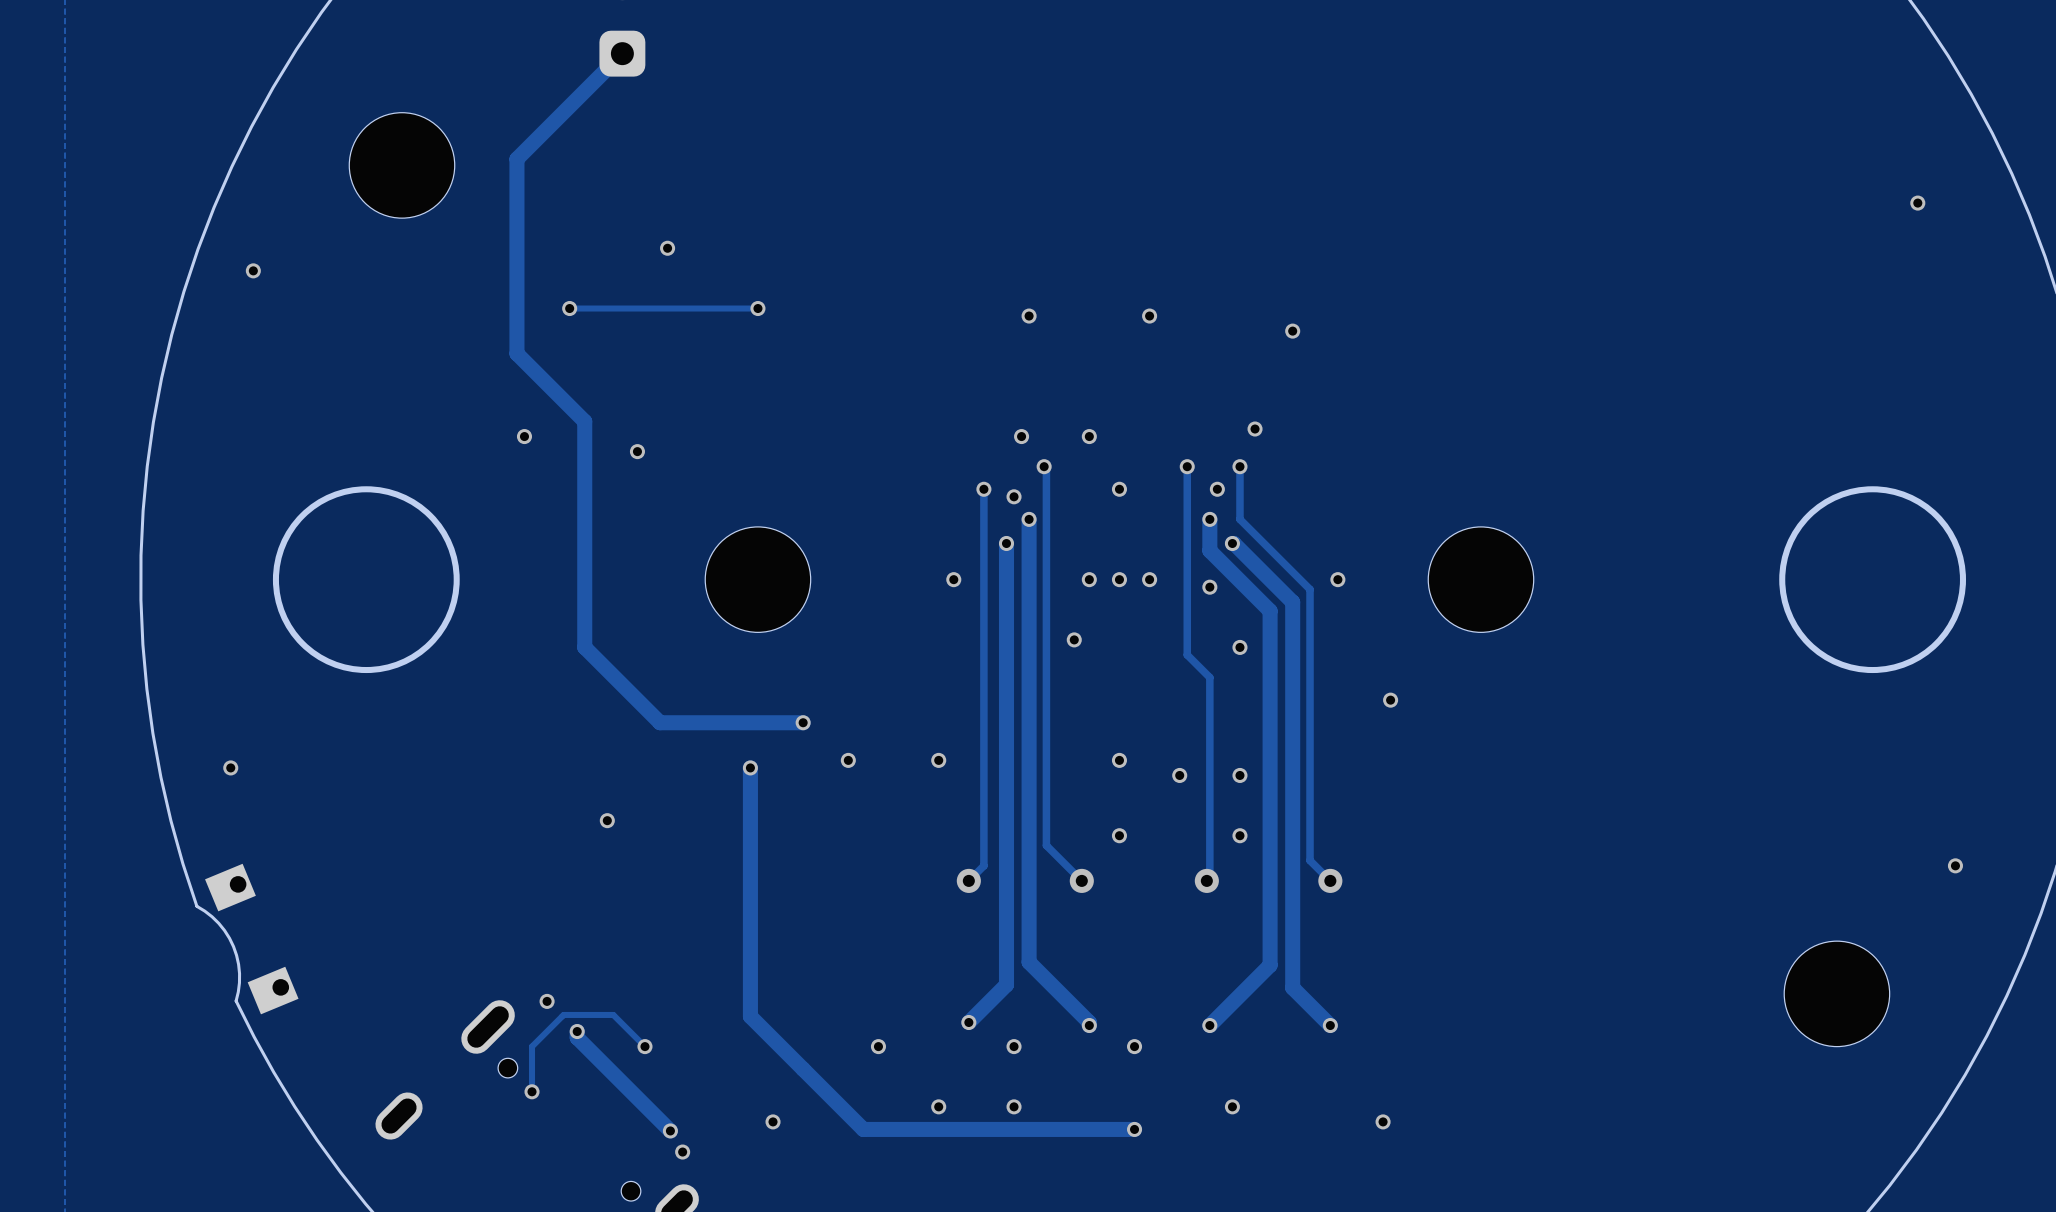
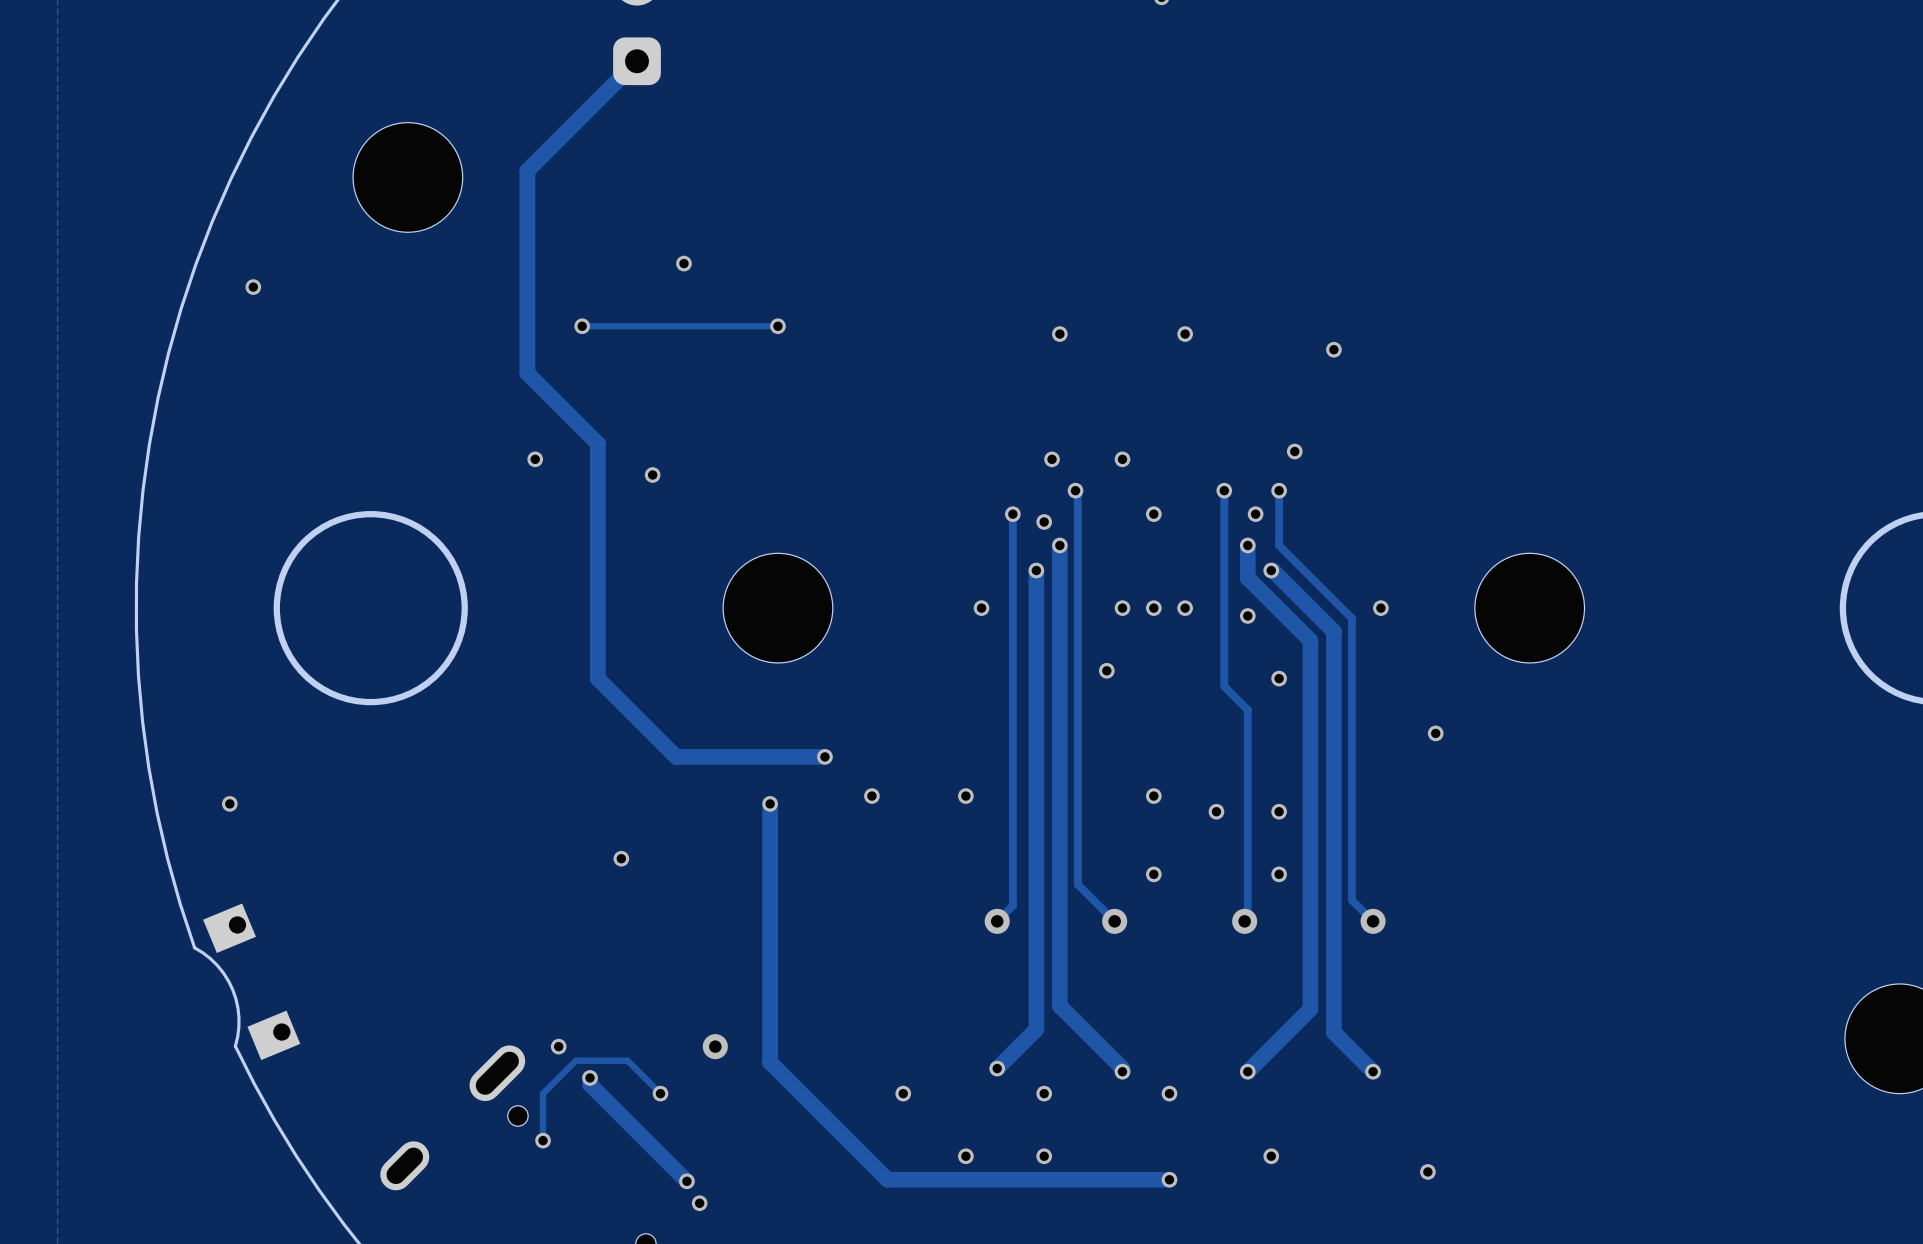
via: none -> (715, 1046)
via: (773, 1121) -> none

